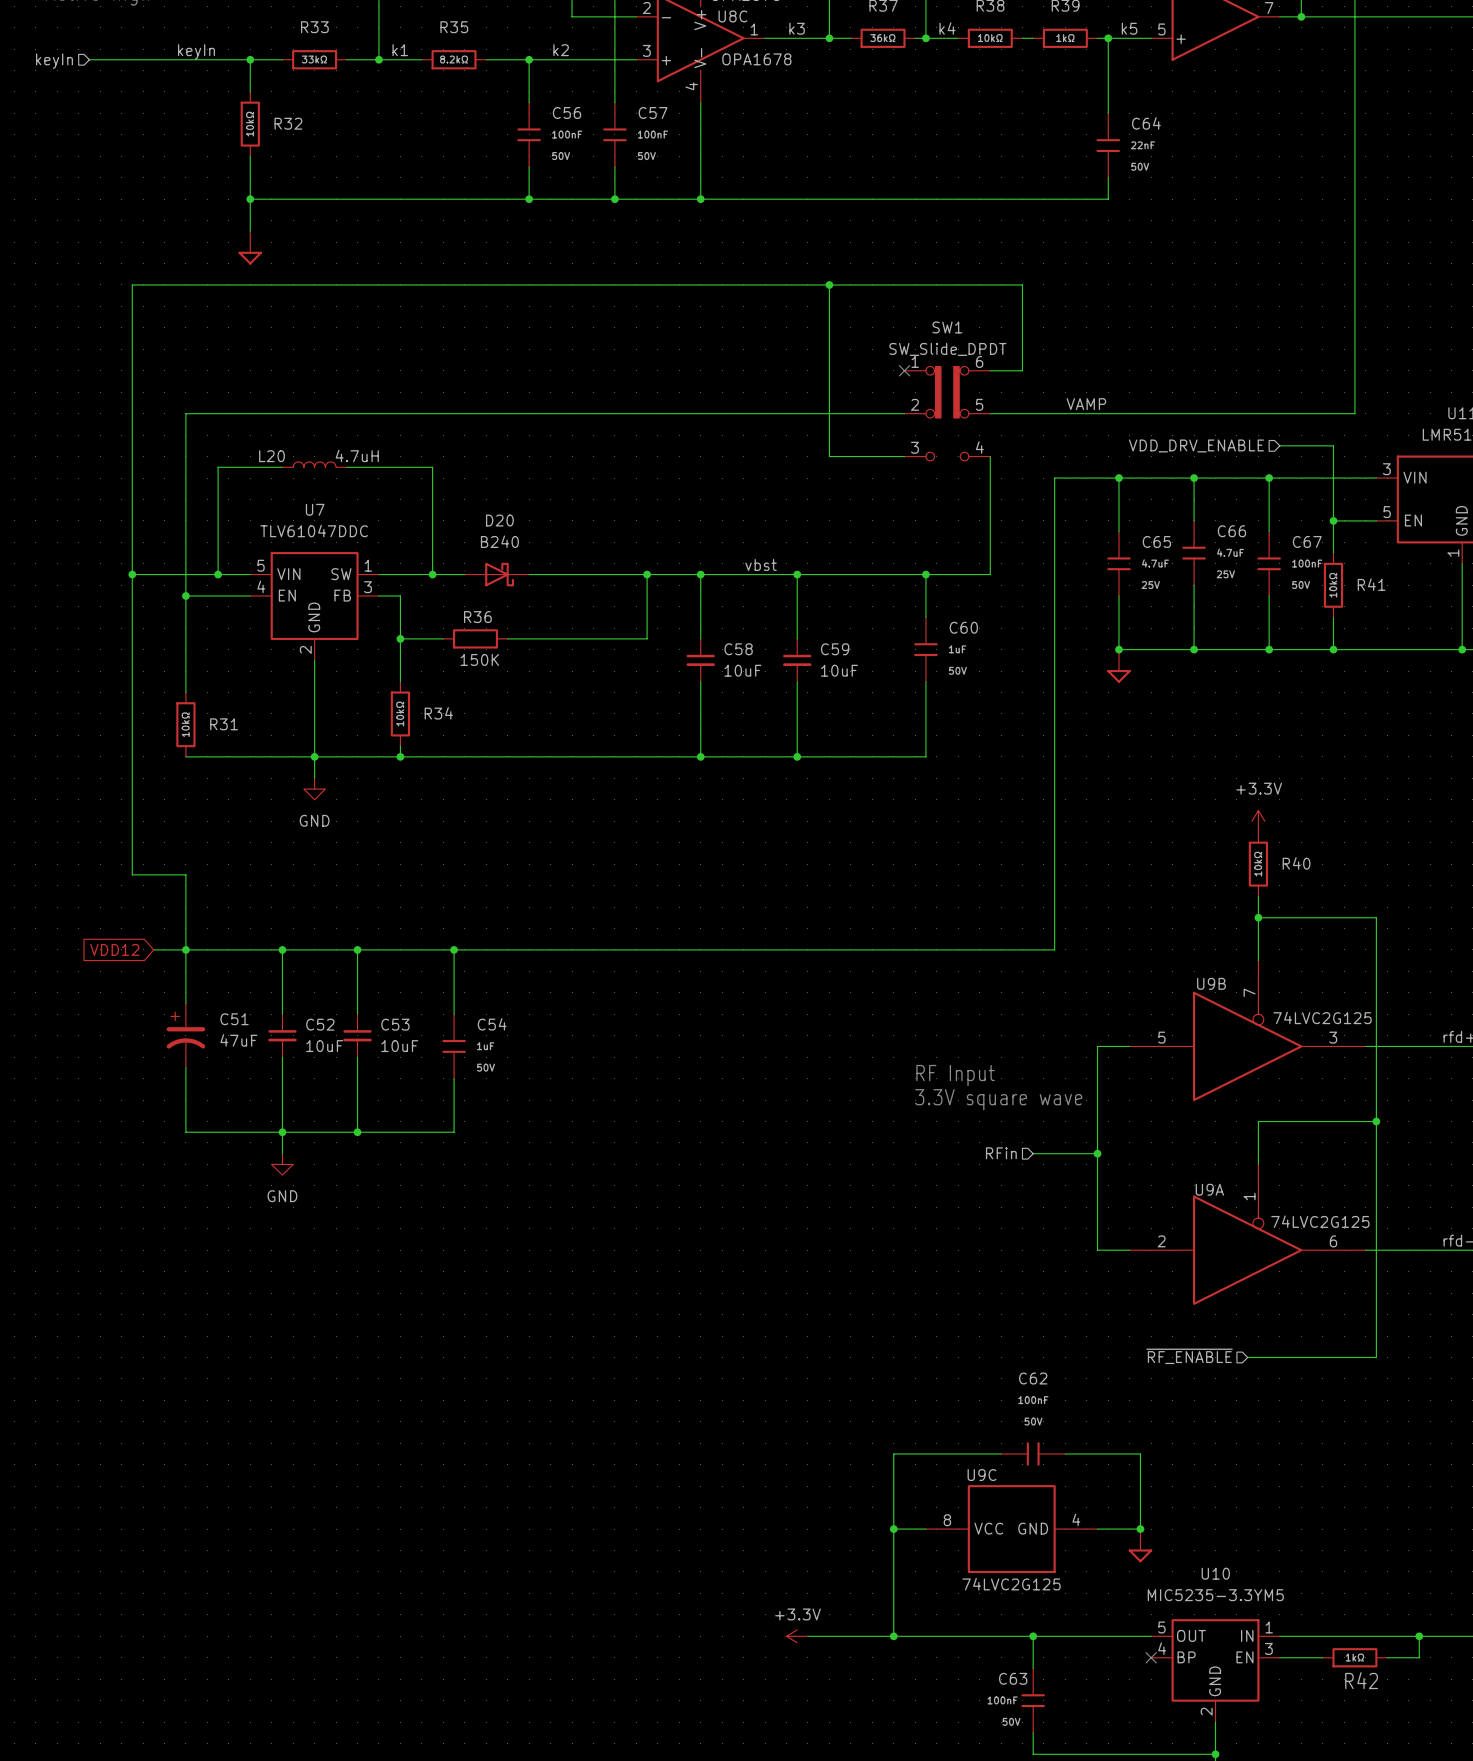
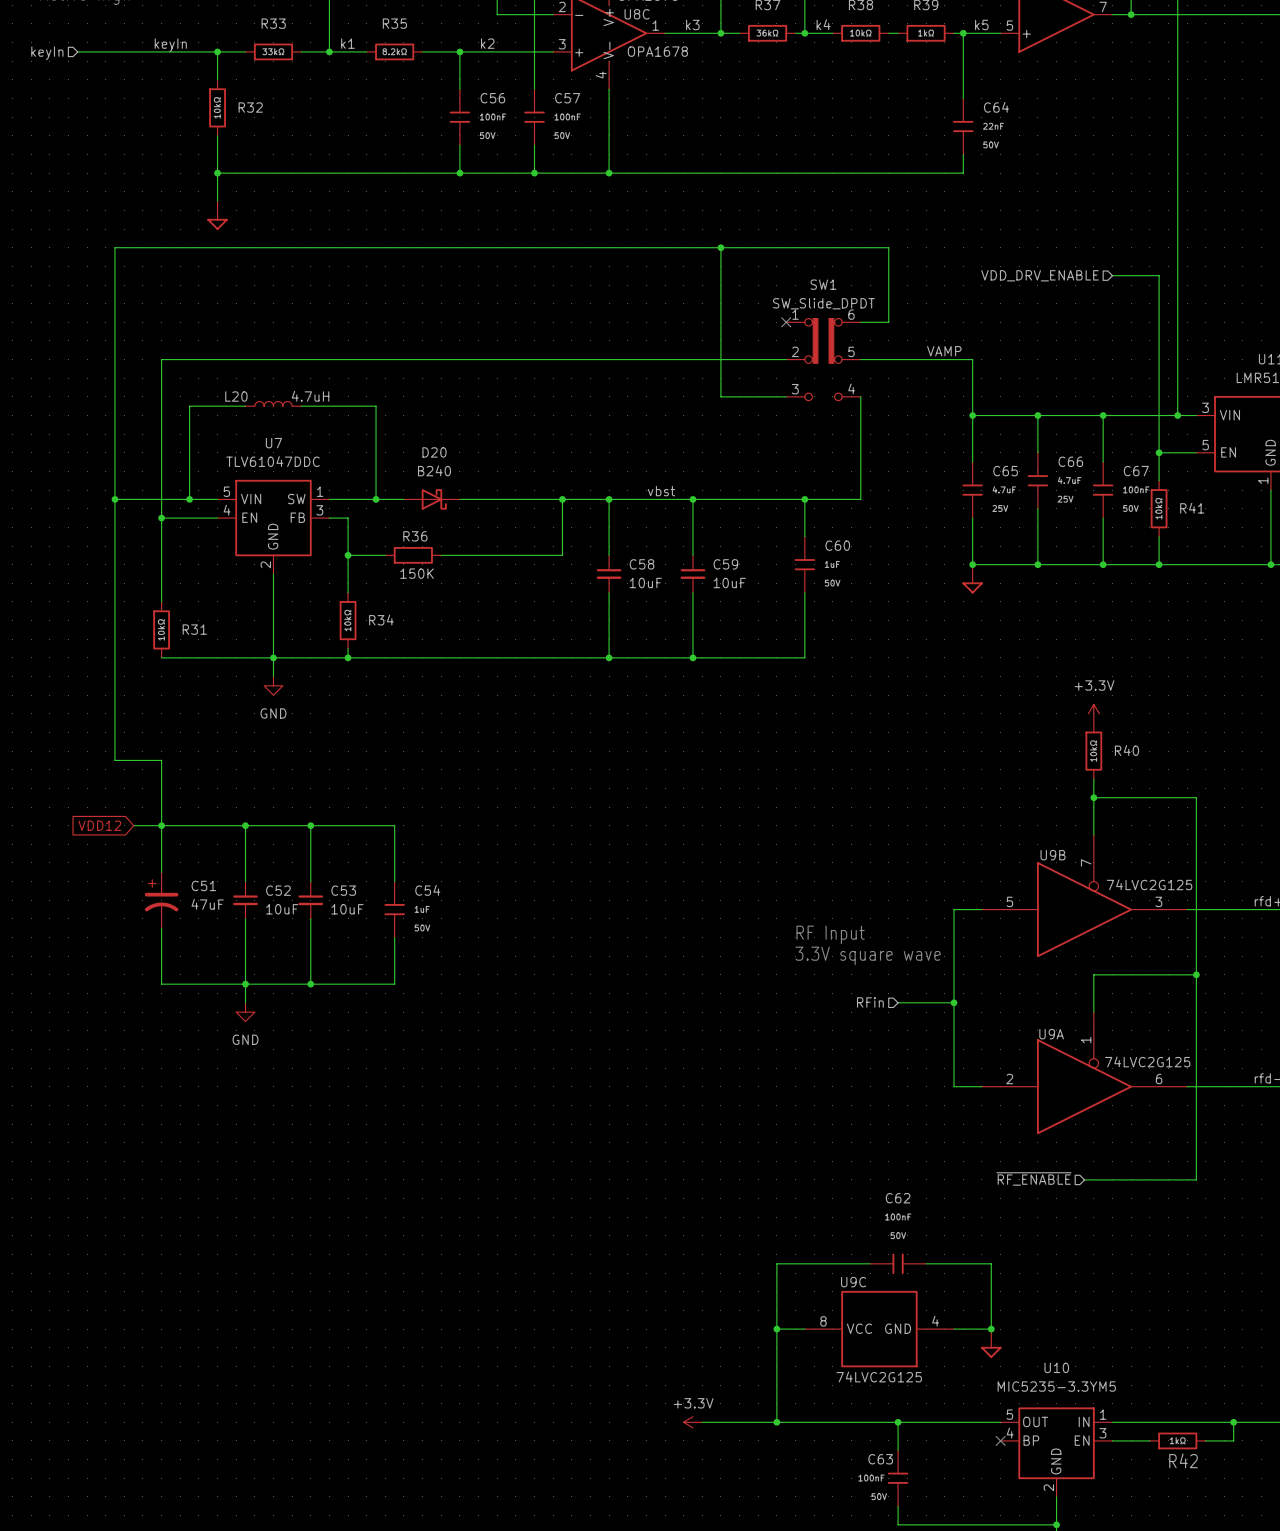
wire: (1118, 413) (1354, 413) -> (972, 359) (972, 415)
wire: none -> (1177, 359) (1177, 415)
hierarchical label position: VDD_DRV_ENABLE (1196, 445) -> VDD_DRV_ENABLE (1039, 275)
wire: (1279, 445) (1333, 445) -> (1112, 275) (1159, 275) (1159, 387)
wire: (1118, 478) (1054, 478) (1054, 949) (454, 949) -> none
junction: none -> (1177, 415)
junction: (454, 949) -> none

